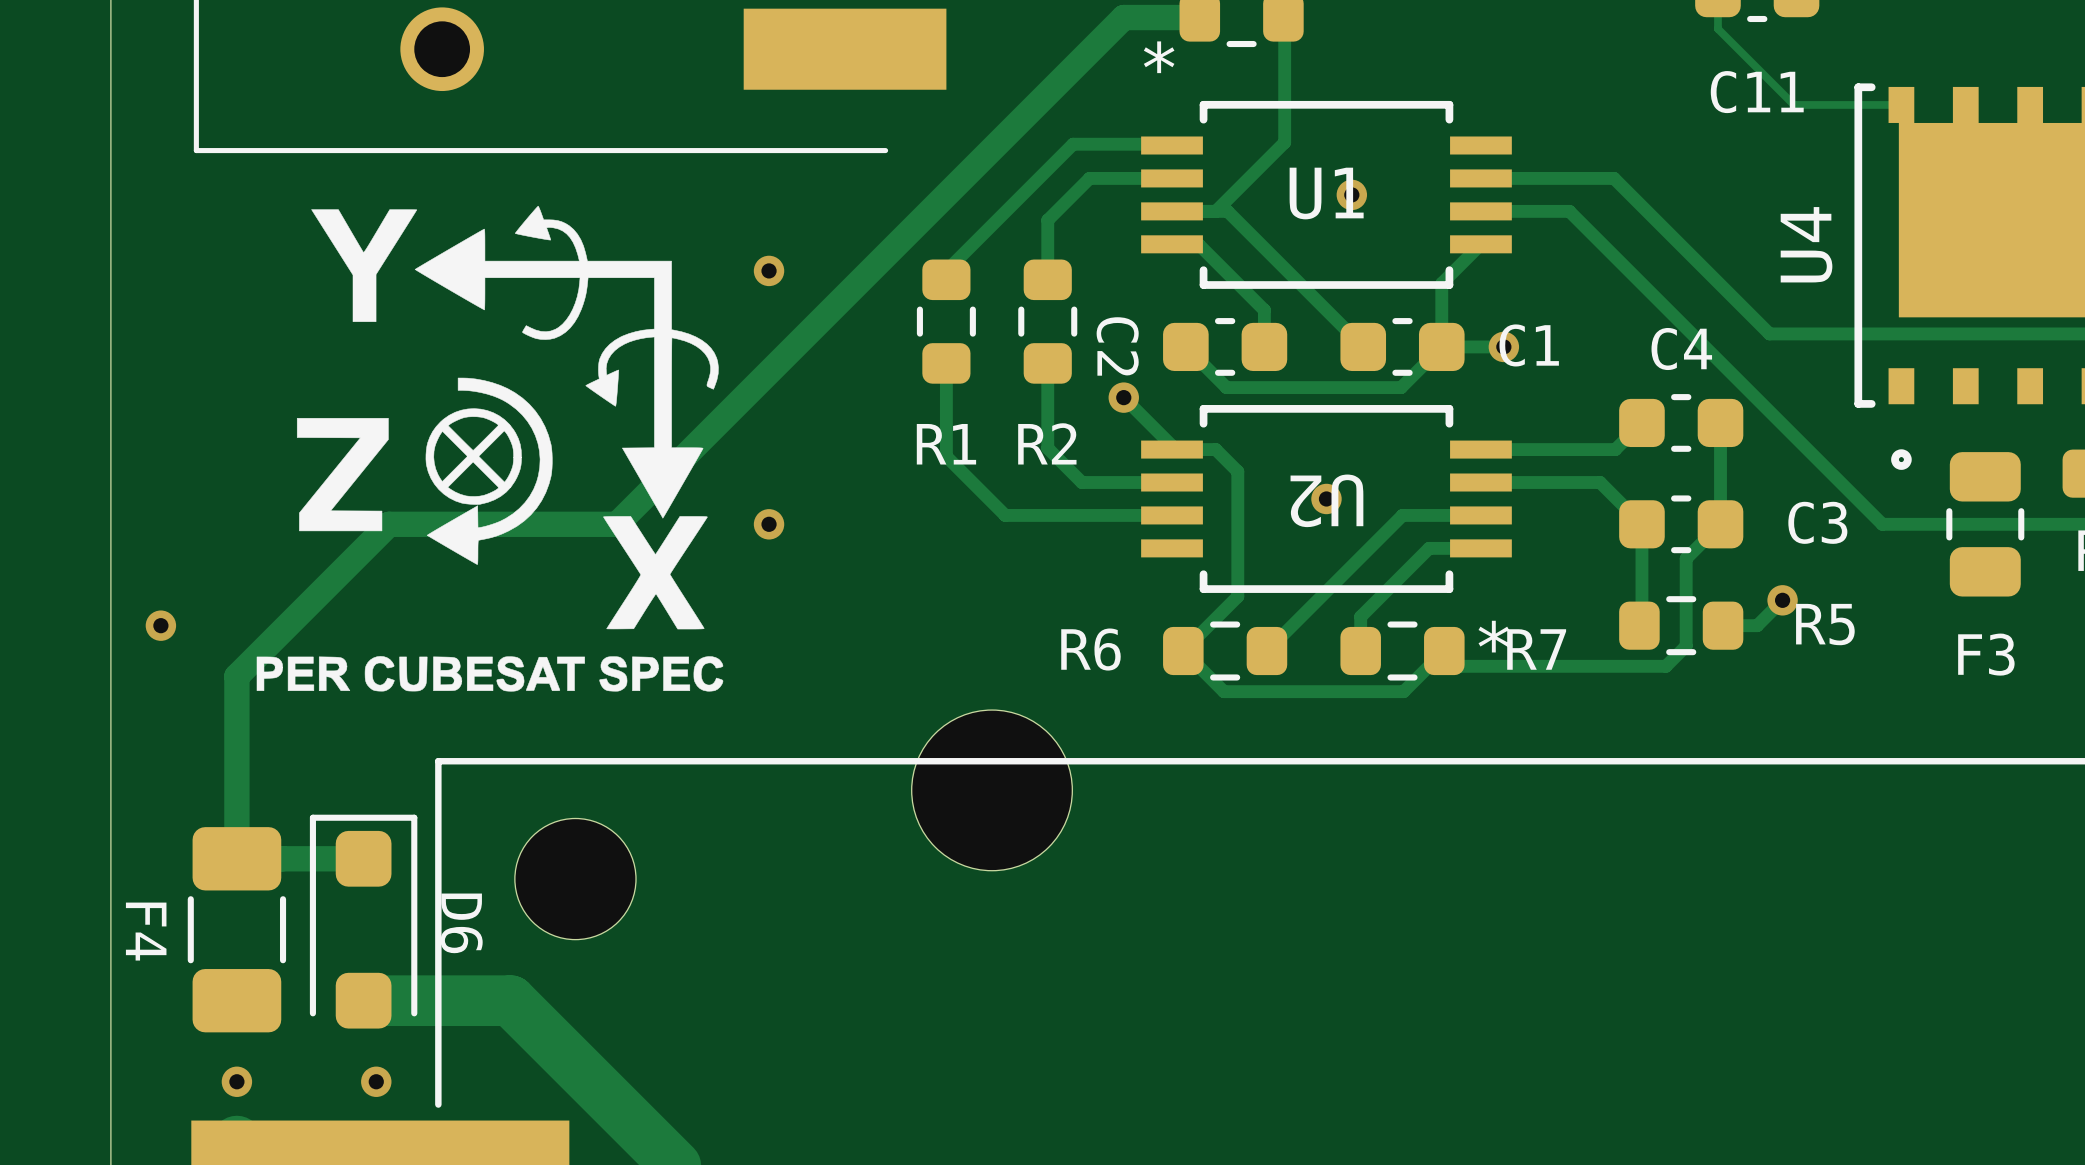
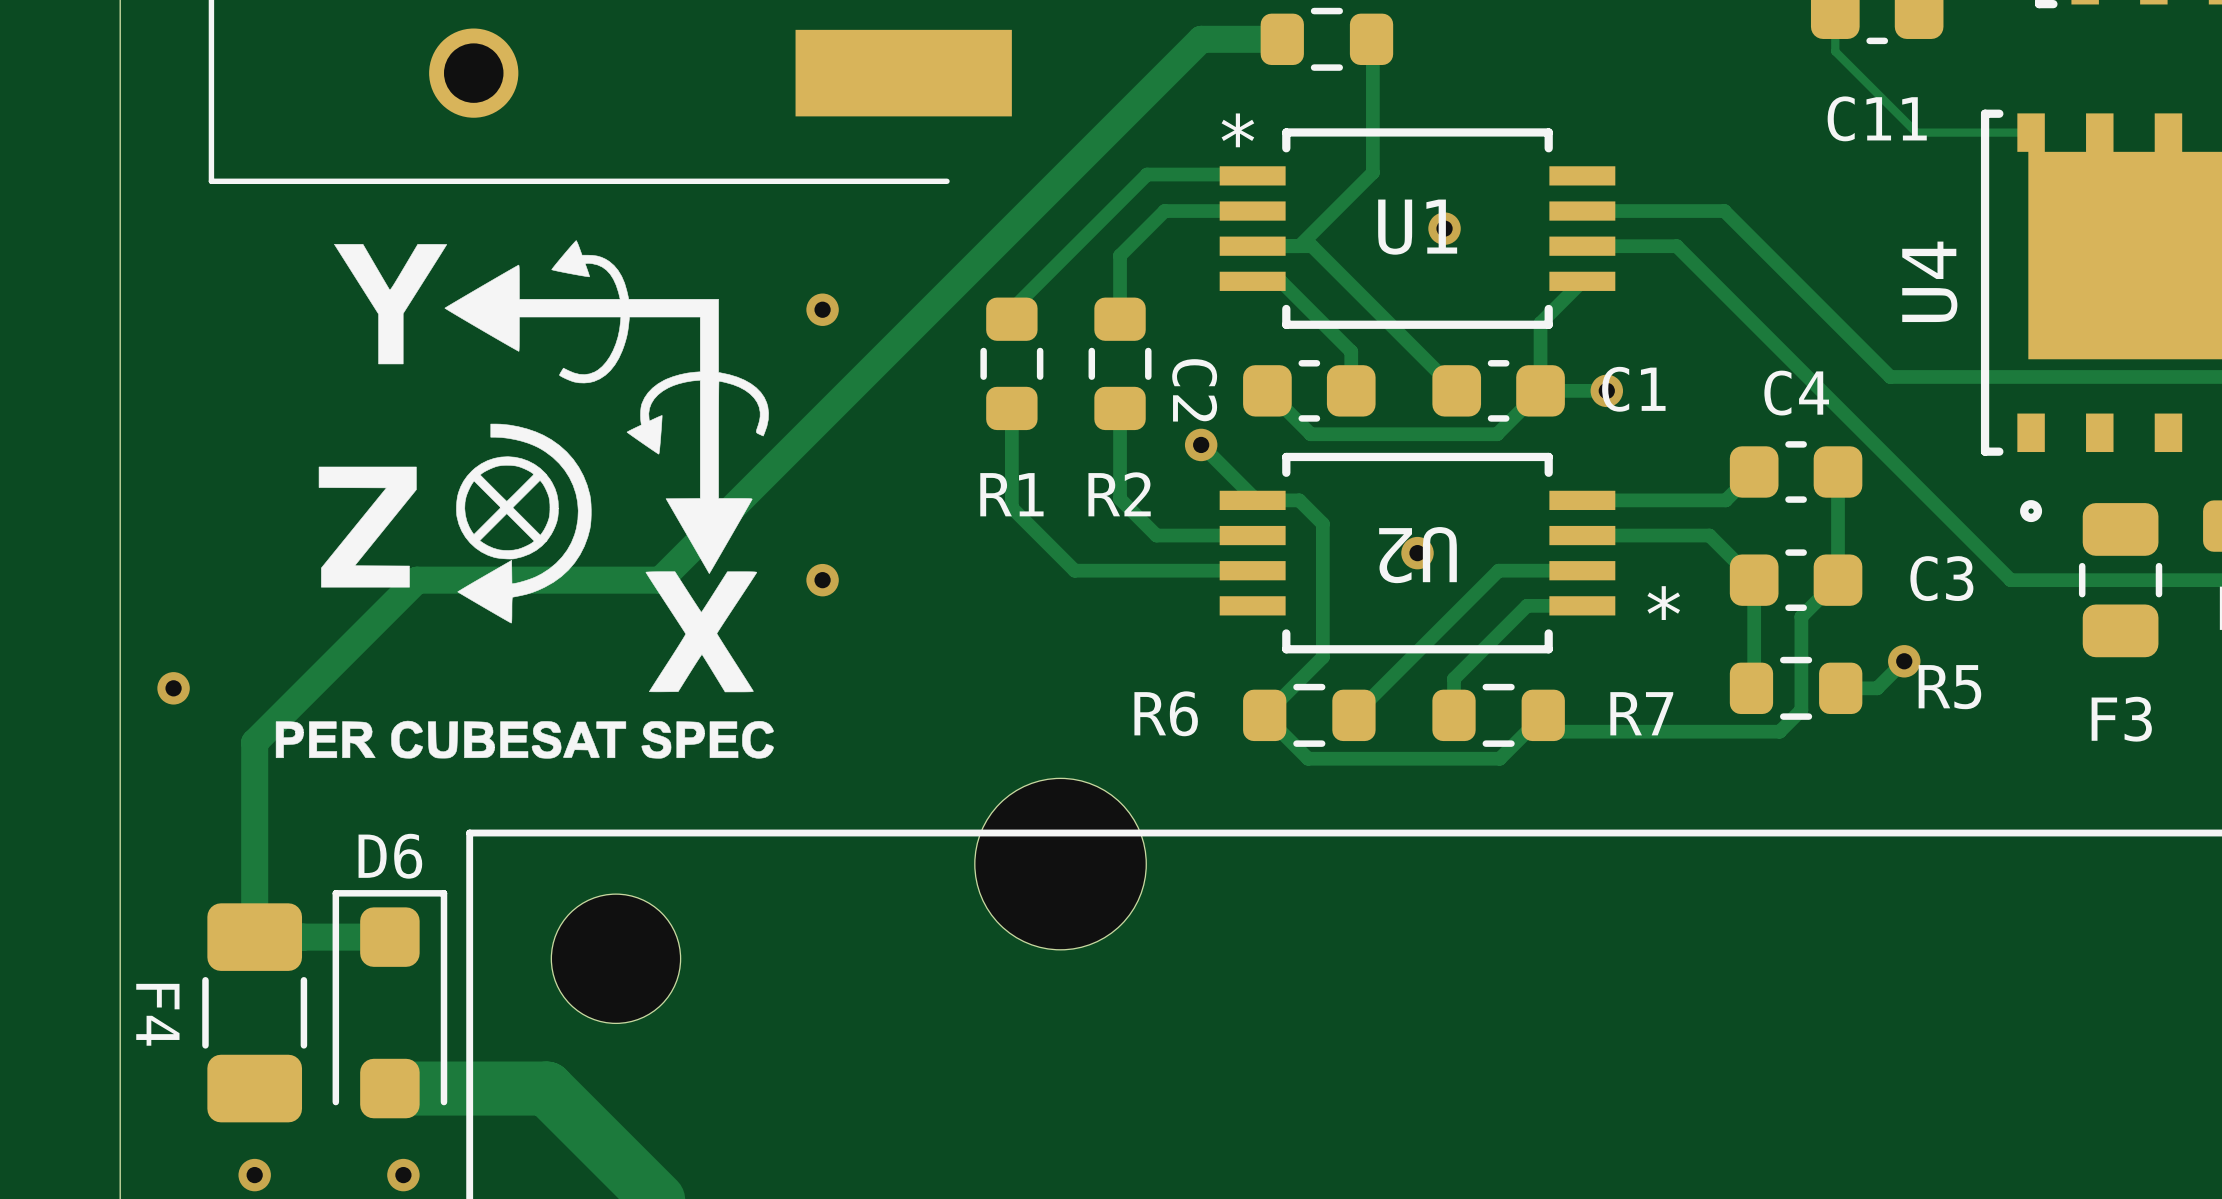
U1 text position: * (1159, 57) -> * (1237, 130)
U2 text position: * (1493, 636) -> * (1663, 603)
D6 name rotation: 0° (461, 923) -> 90° counterclockwise (390, 856)
D6 name position: D6 (461, 923) -> D6 (390, 856)

